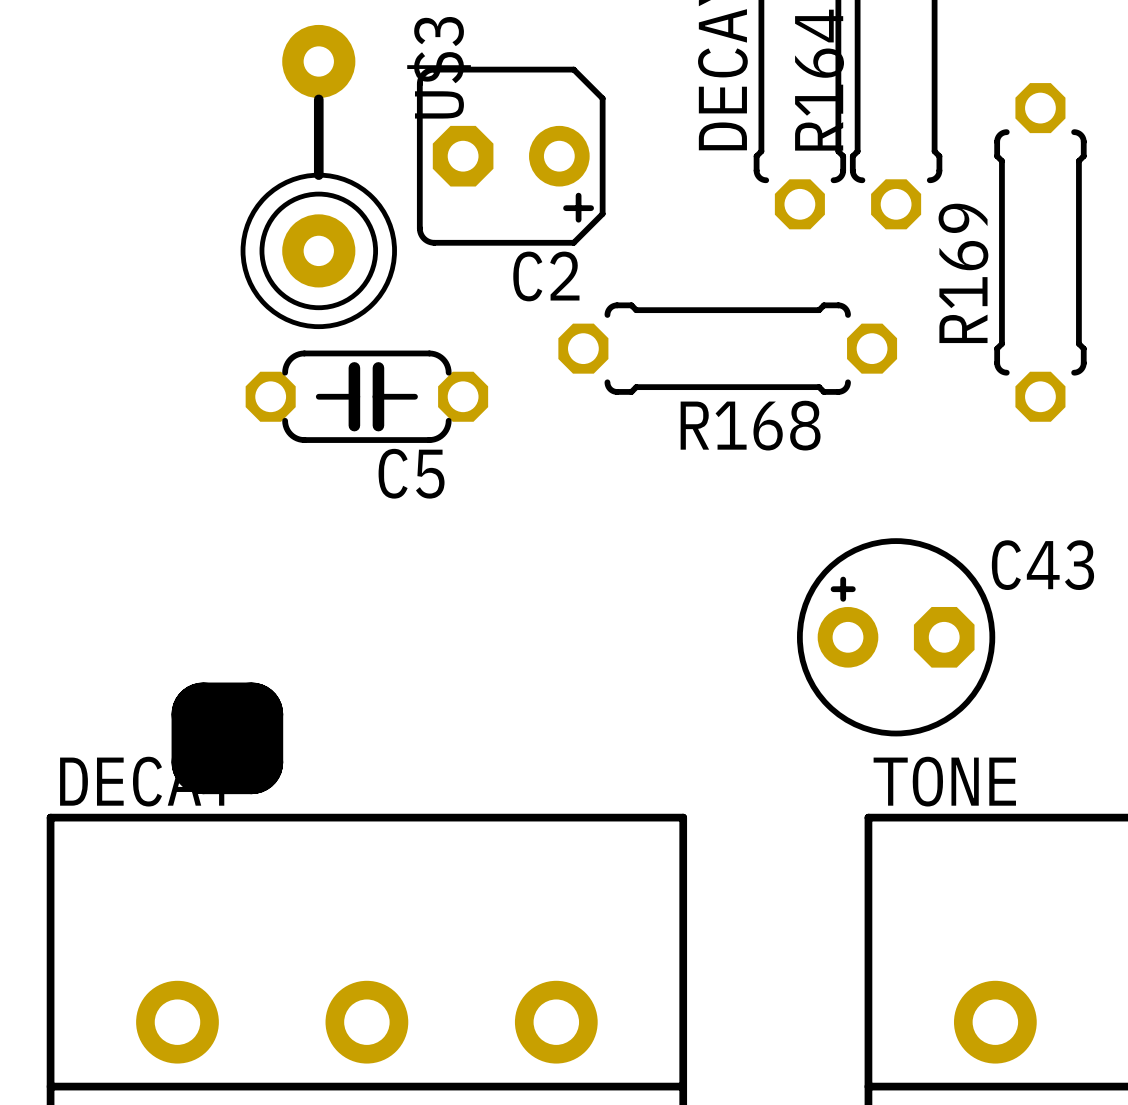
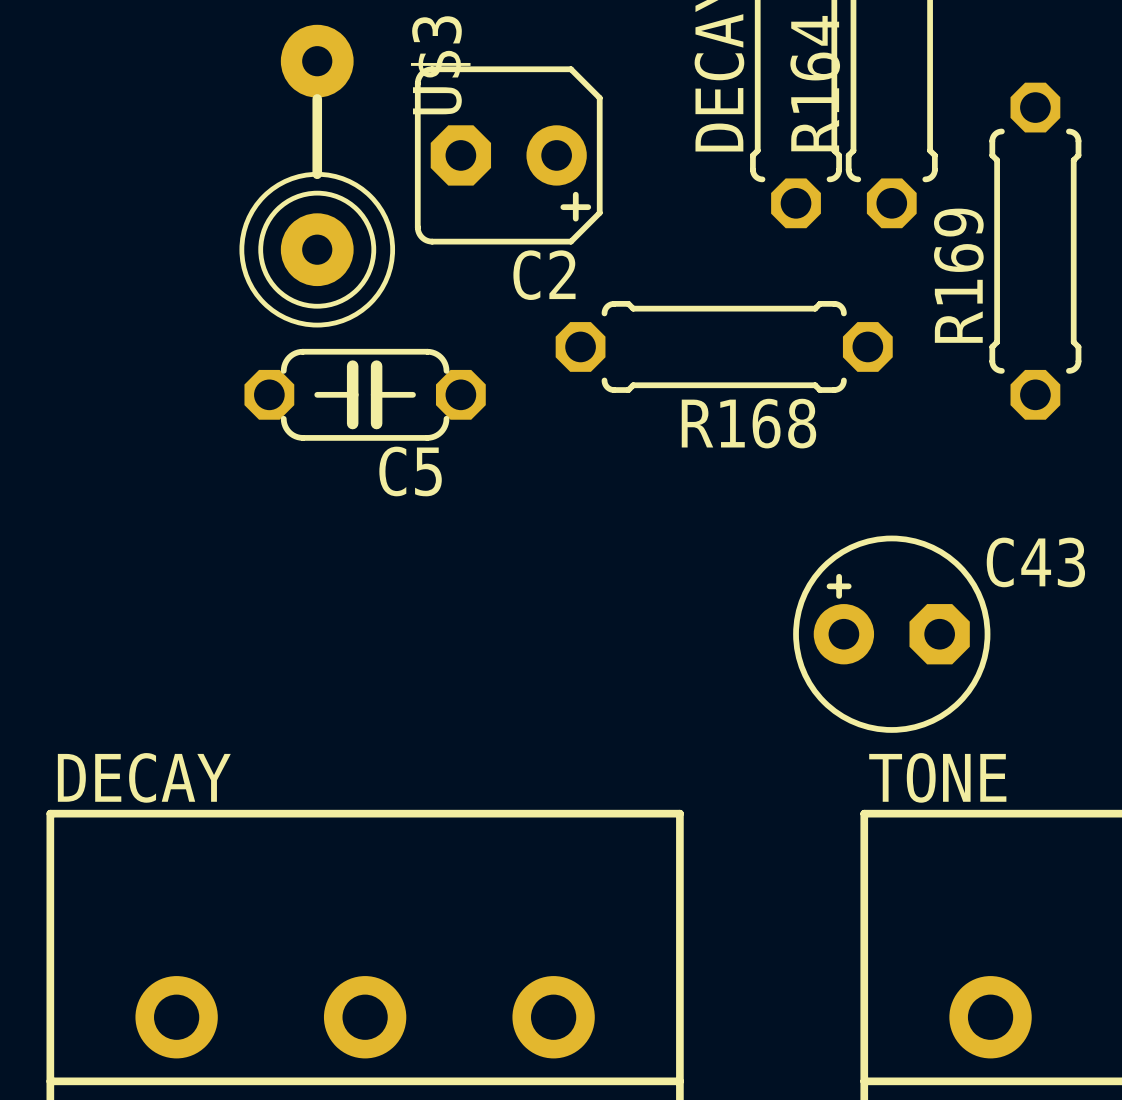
board edge: (203, 714) (251, 714) (251, 762) (203, 762) (203, 714) -> none

